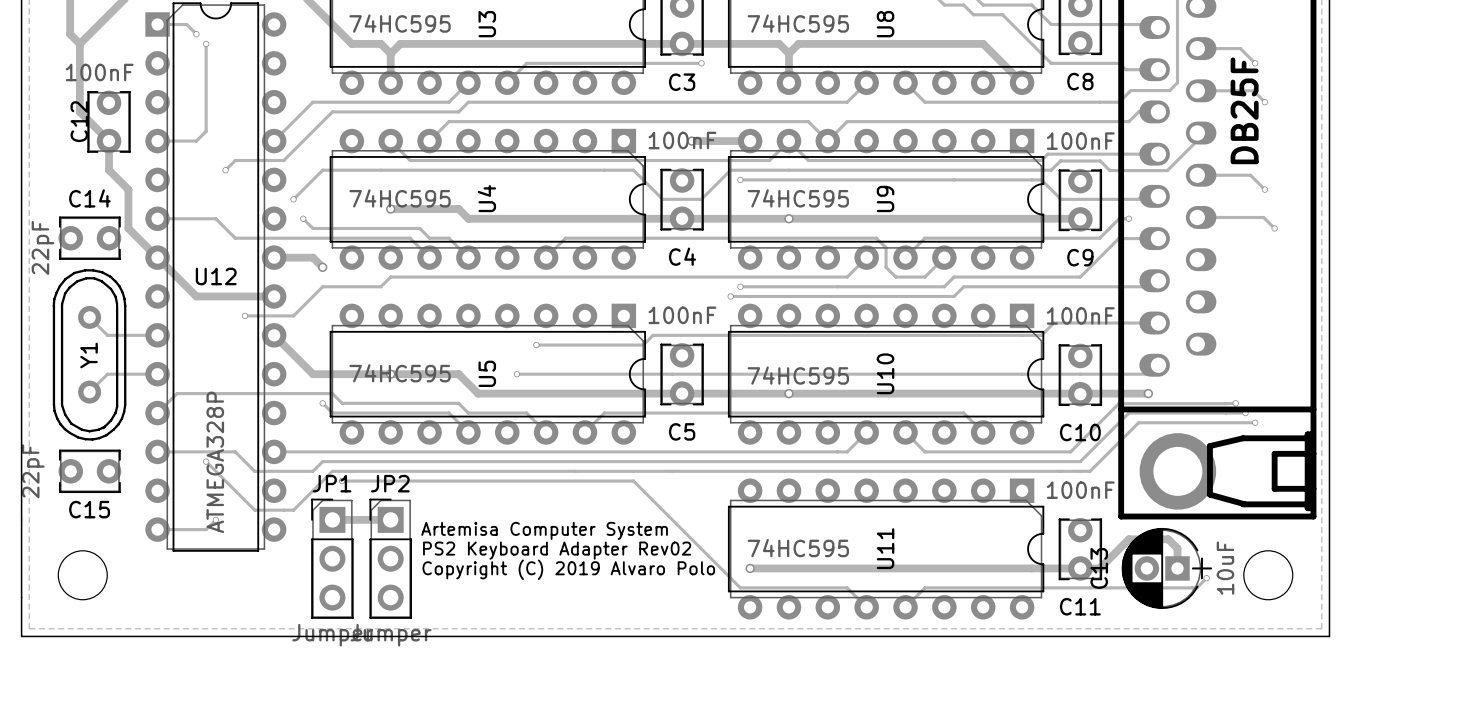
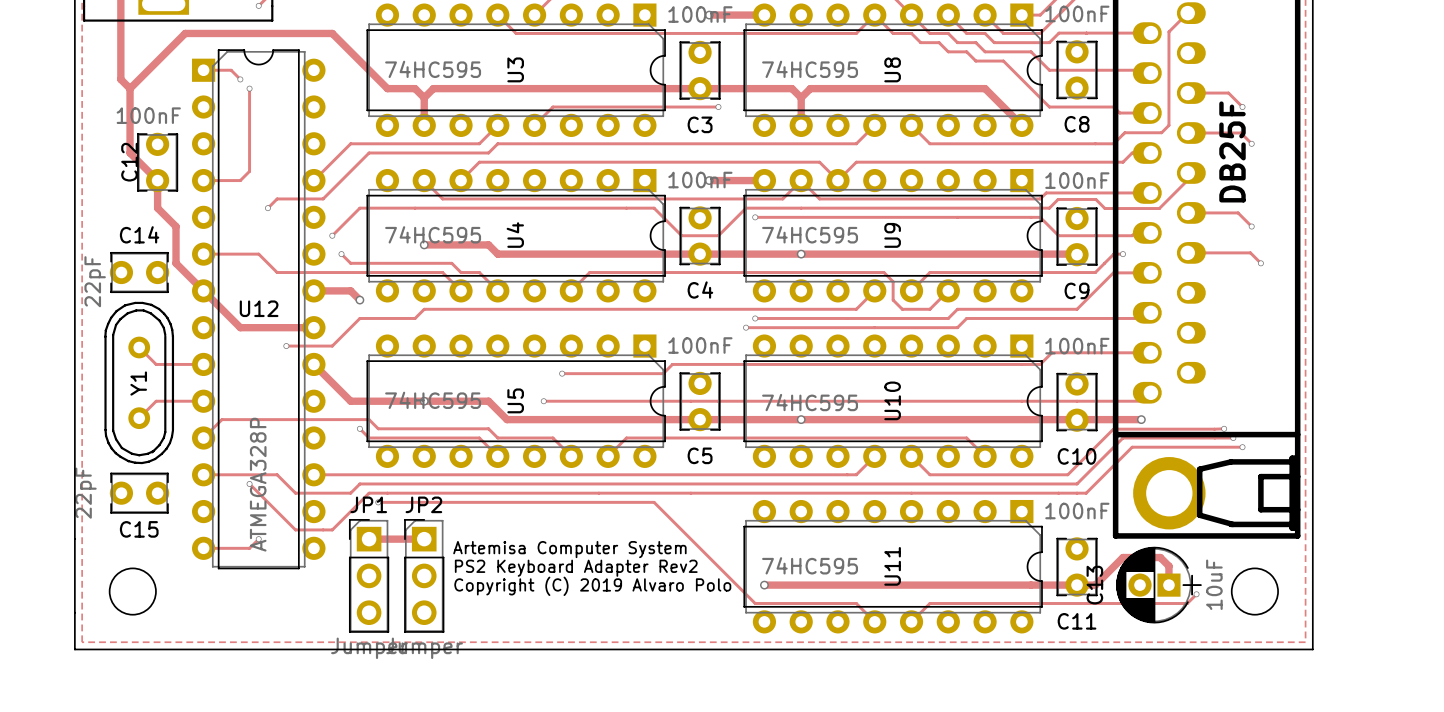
text: PS2 Keyboard Adapter Rev02 (557, 550) -> PS2 Keyboard Adapter Rev2 (576, 568)

